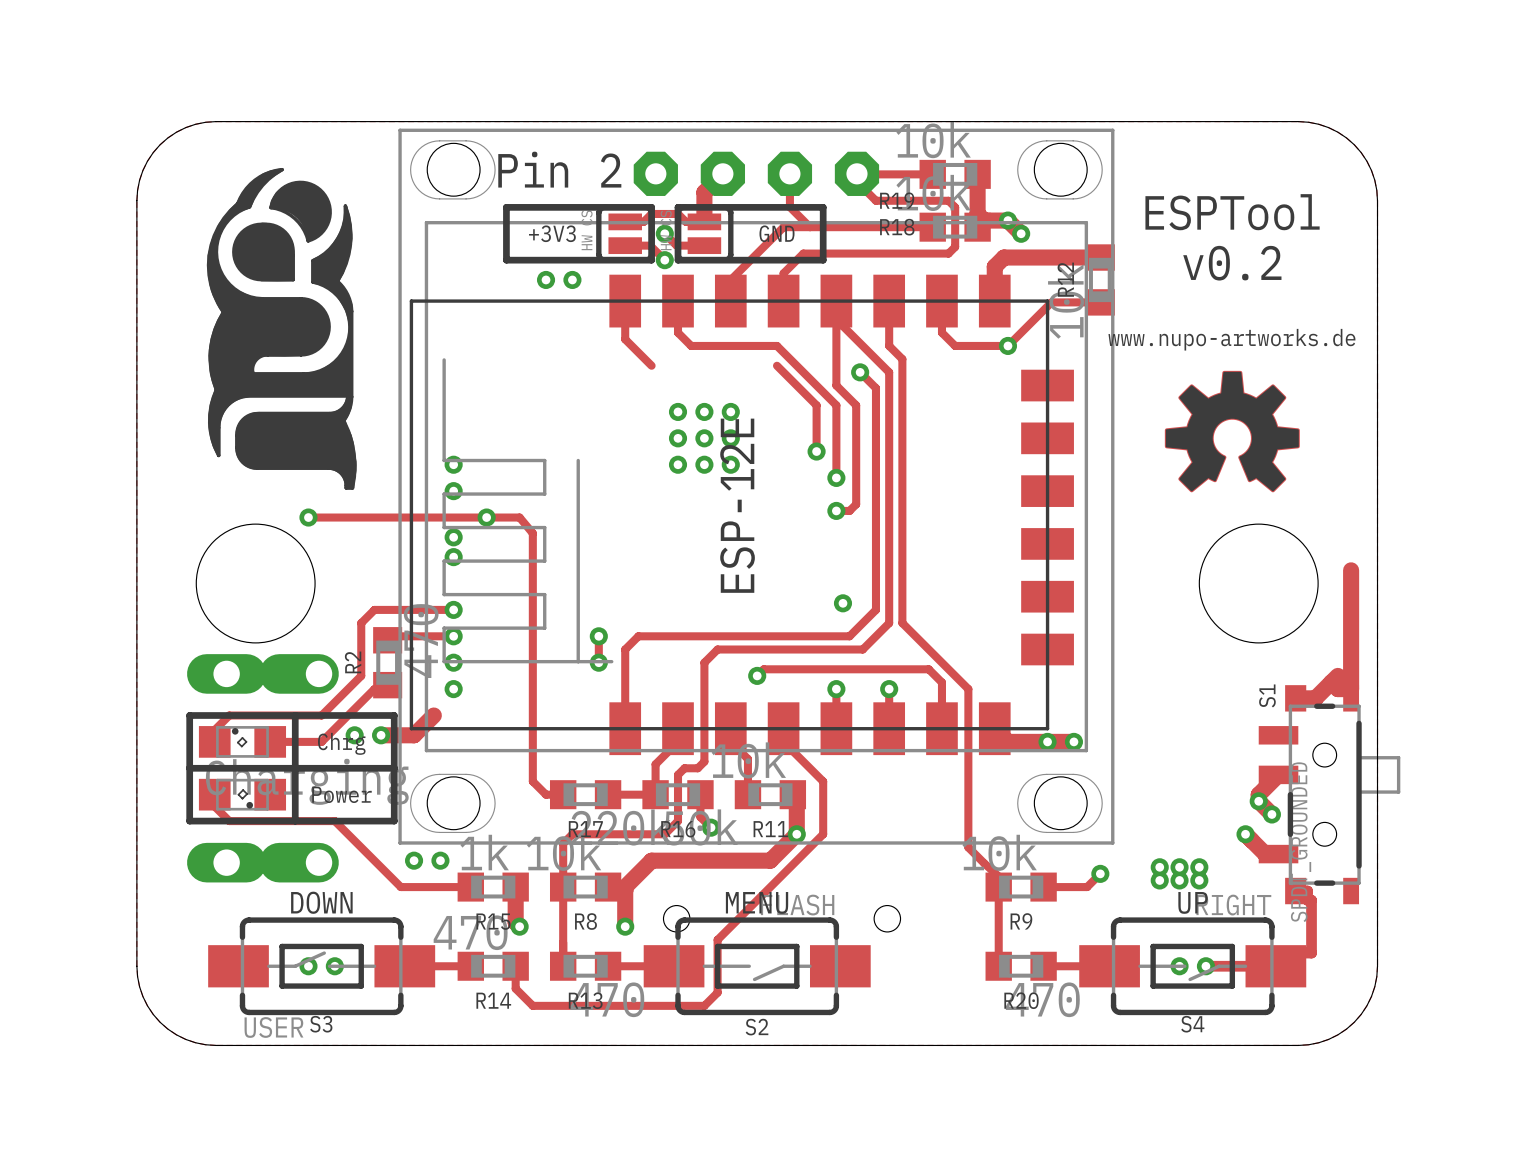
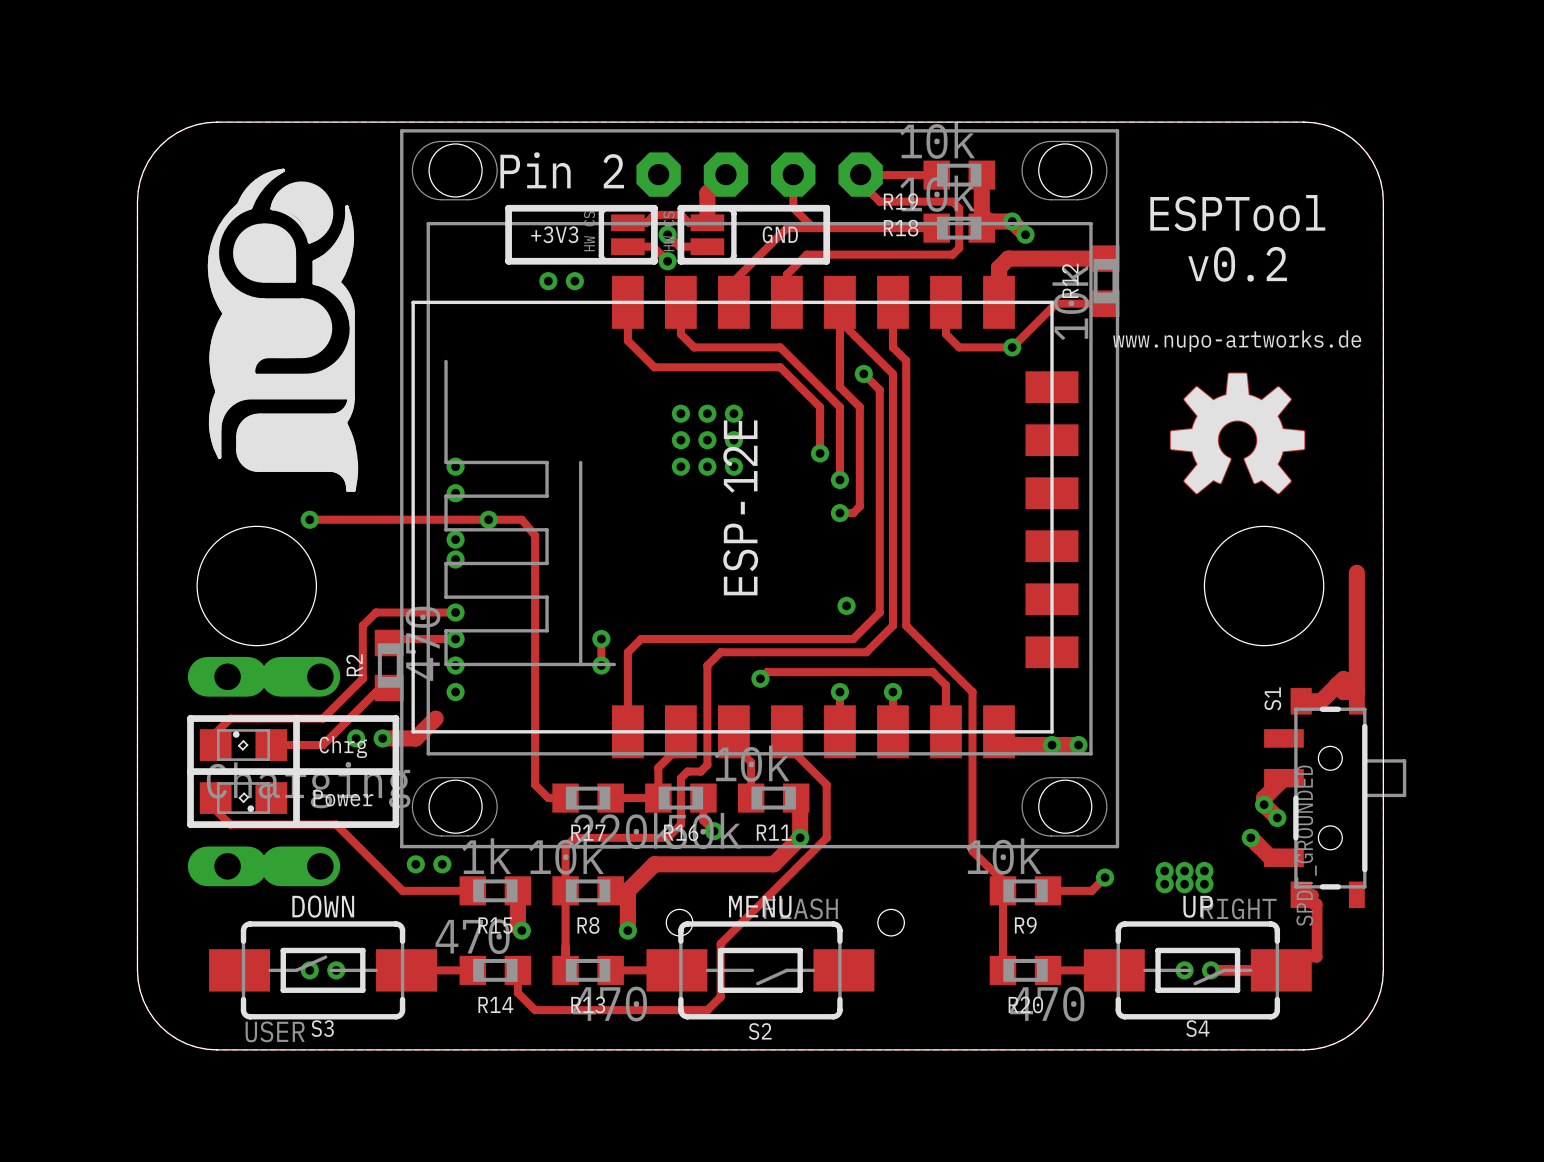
track: none -> (654, 367) (780, 367)

